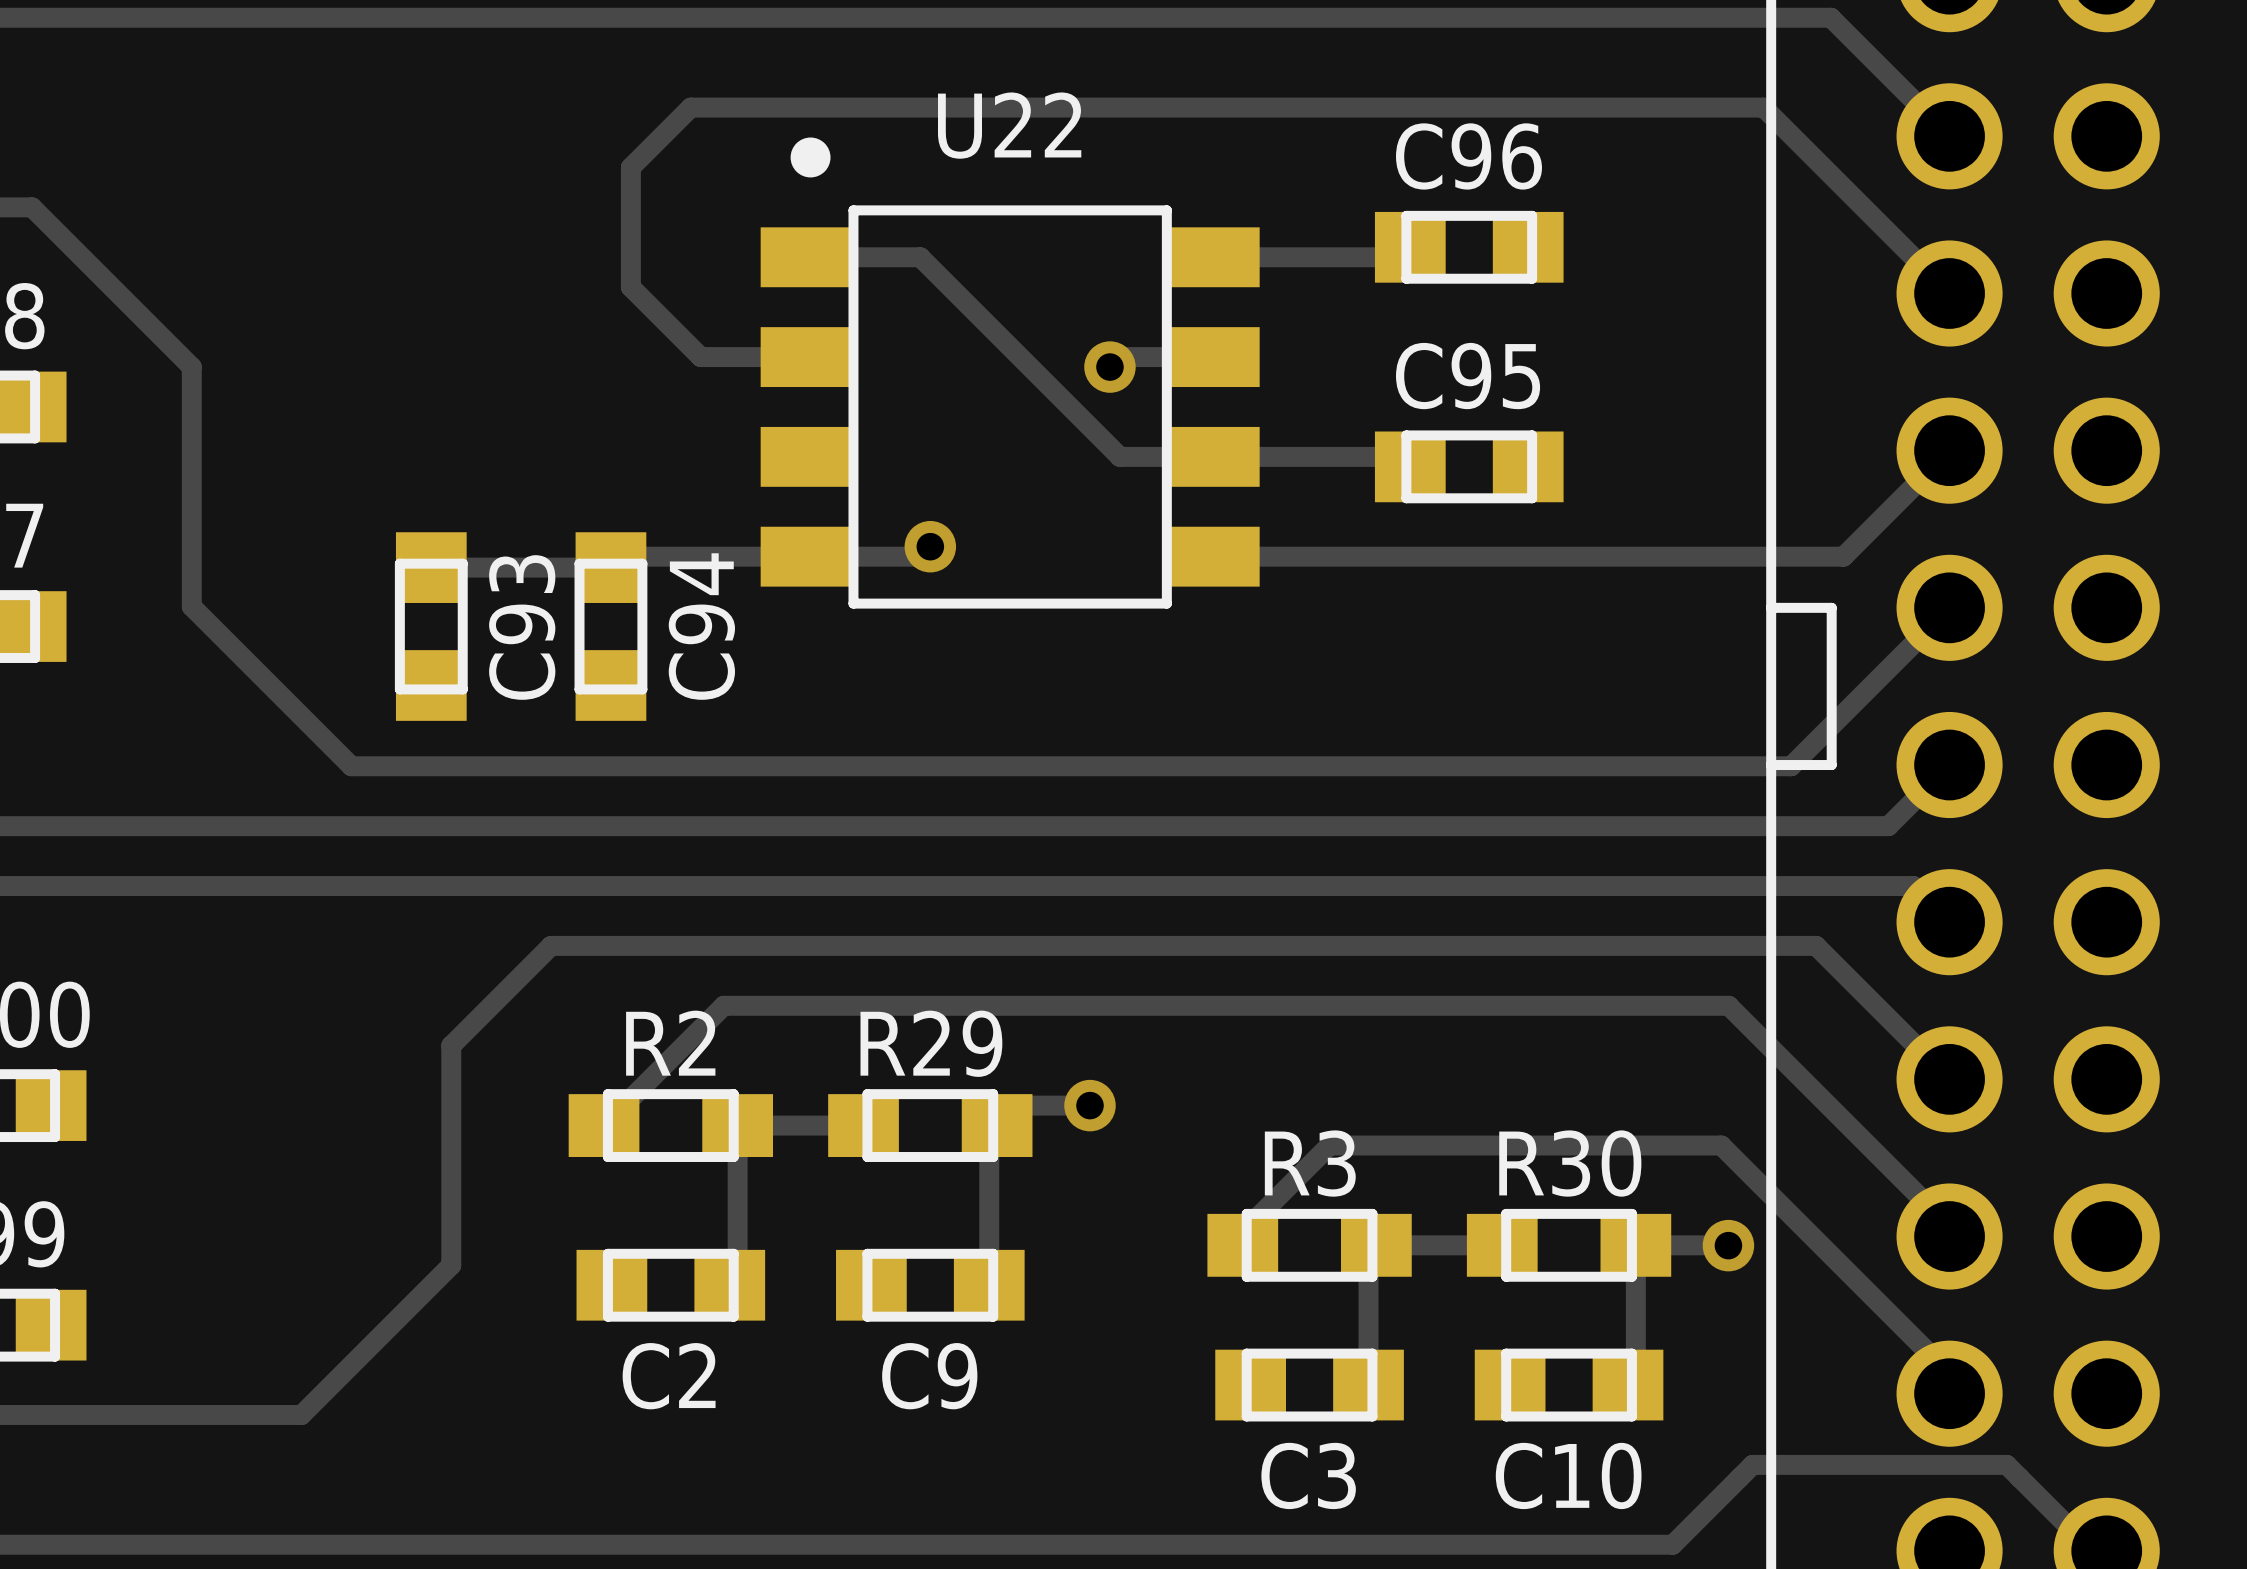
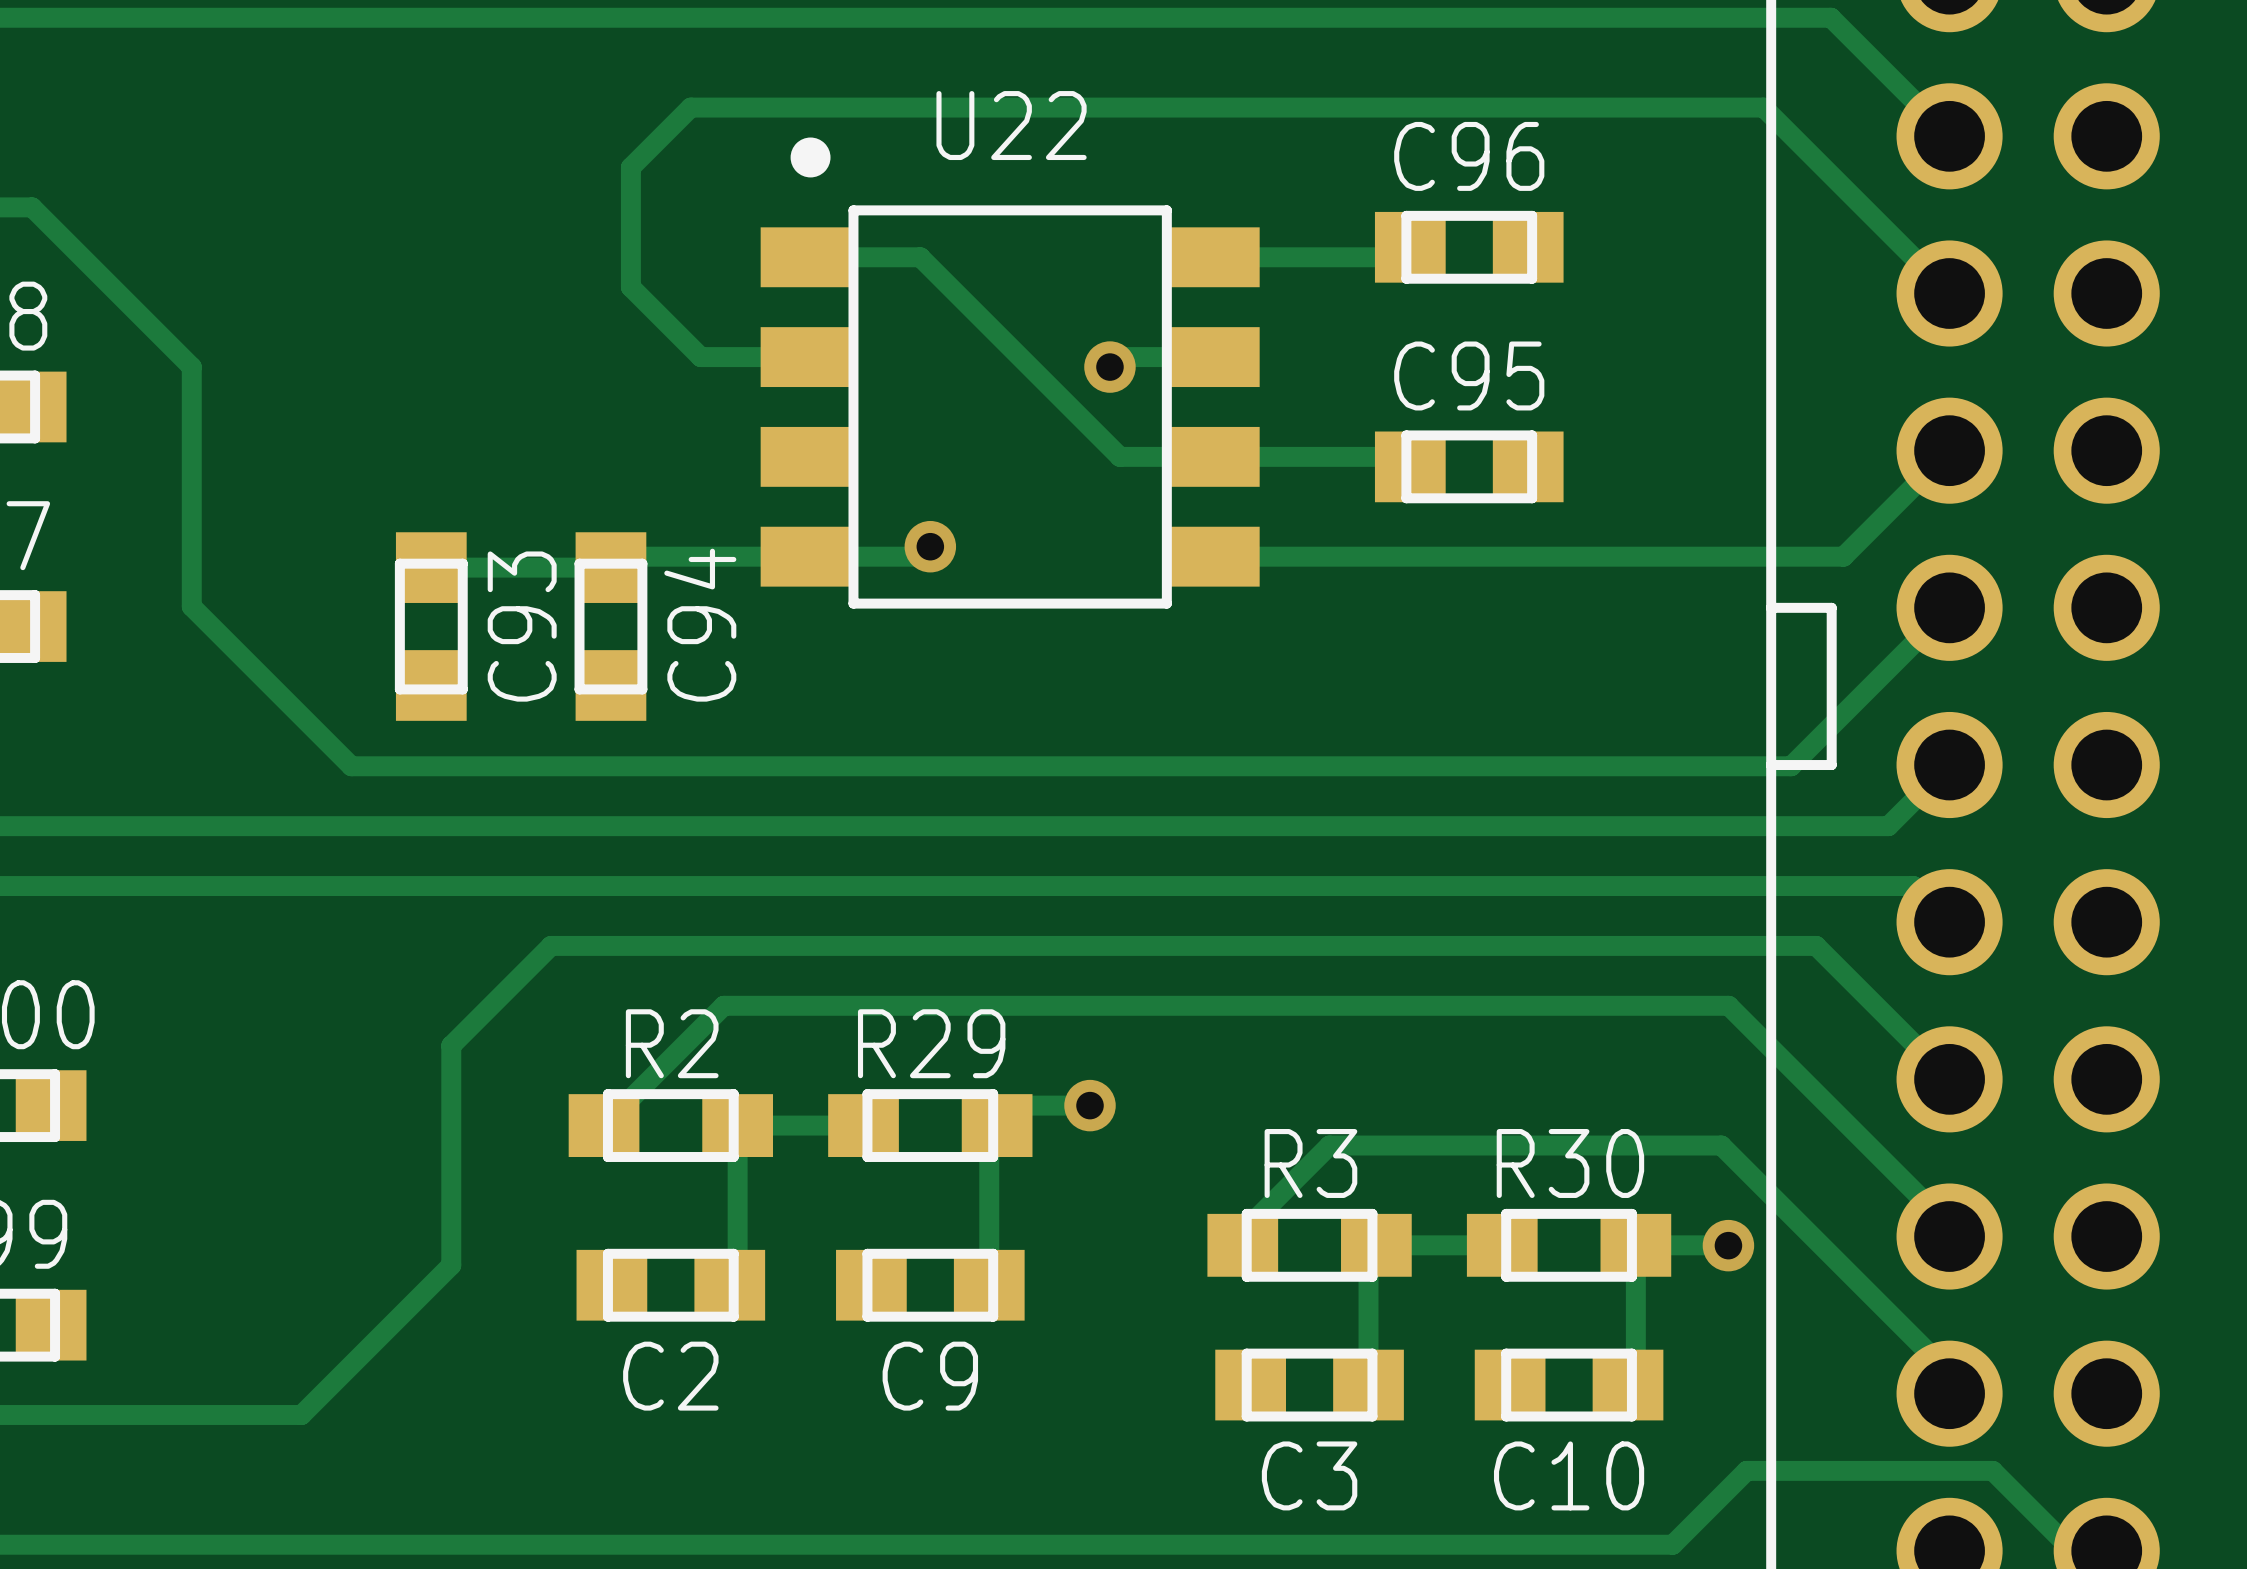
track: (1746, 1470) (1752, 1464) (2006, 1464) (2092, 1550) -> (1746, 1470) (1992, 1470) (2072, 1550) (2092, 1550)

